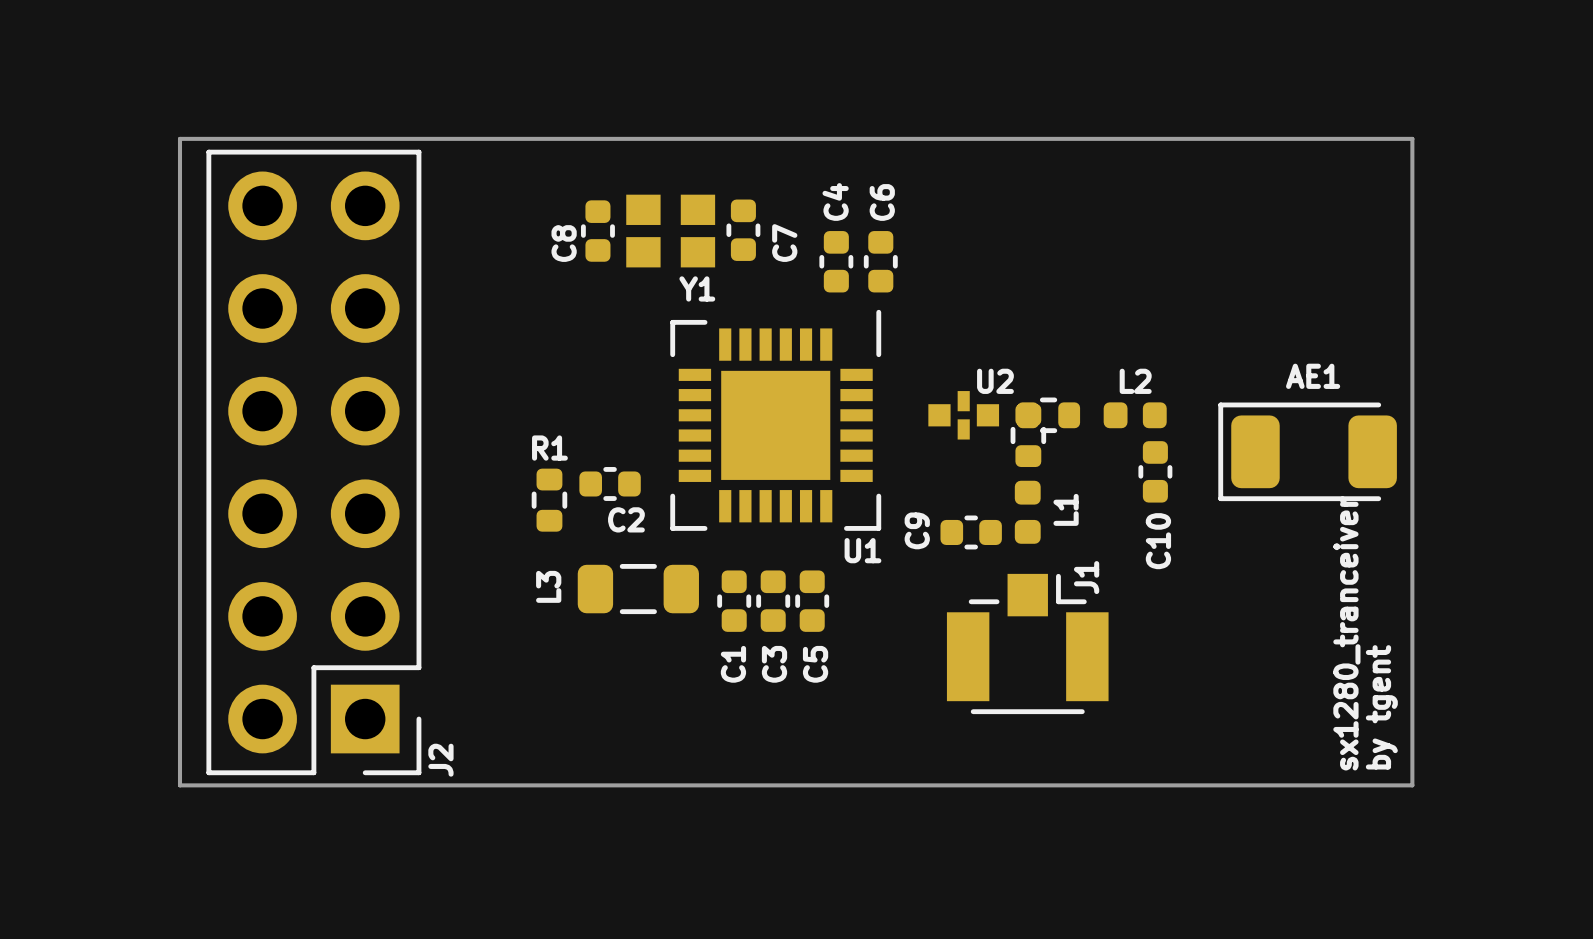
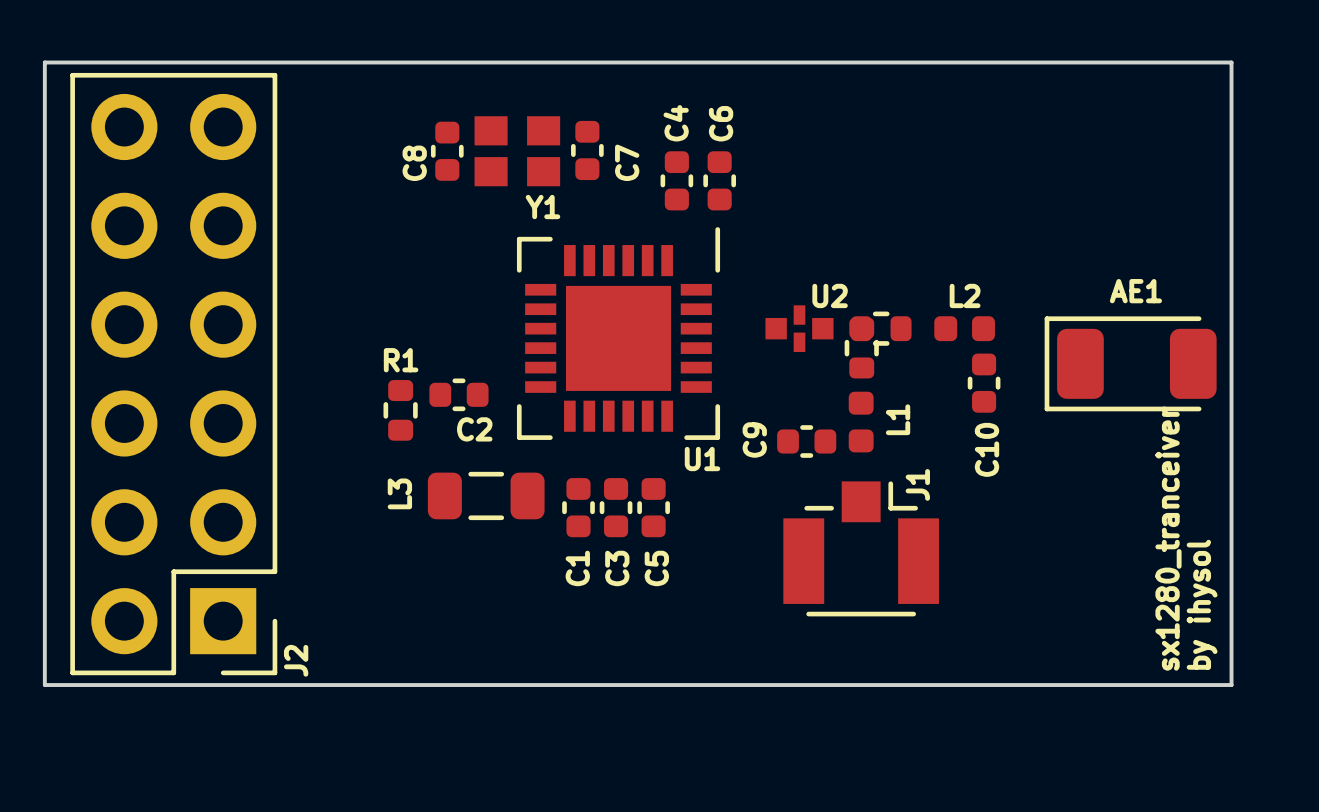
text: by tgent (1381, 707) -> by ihysol (1202, 604)

